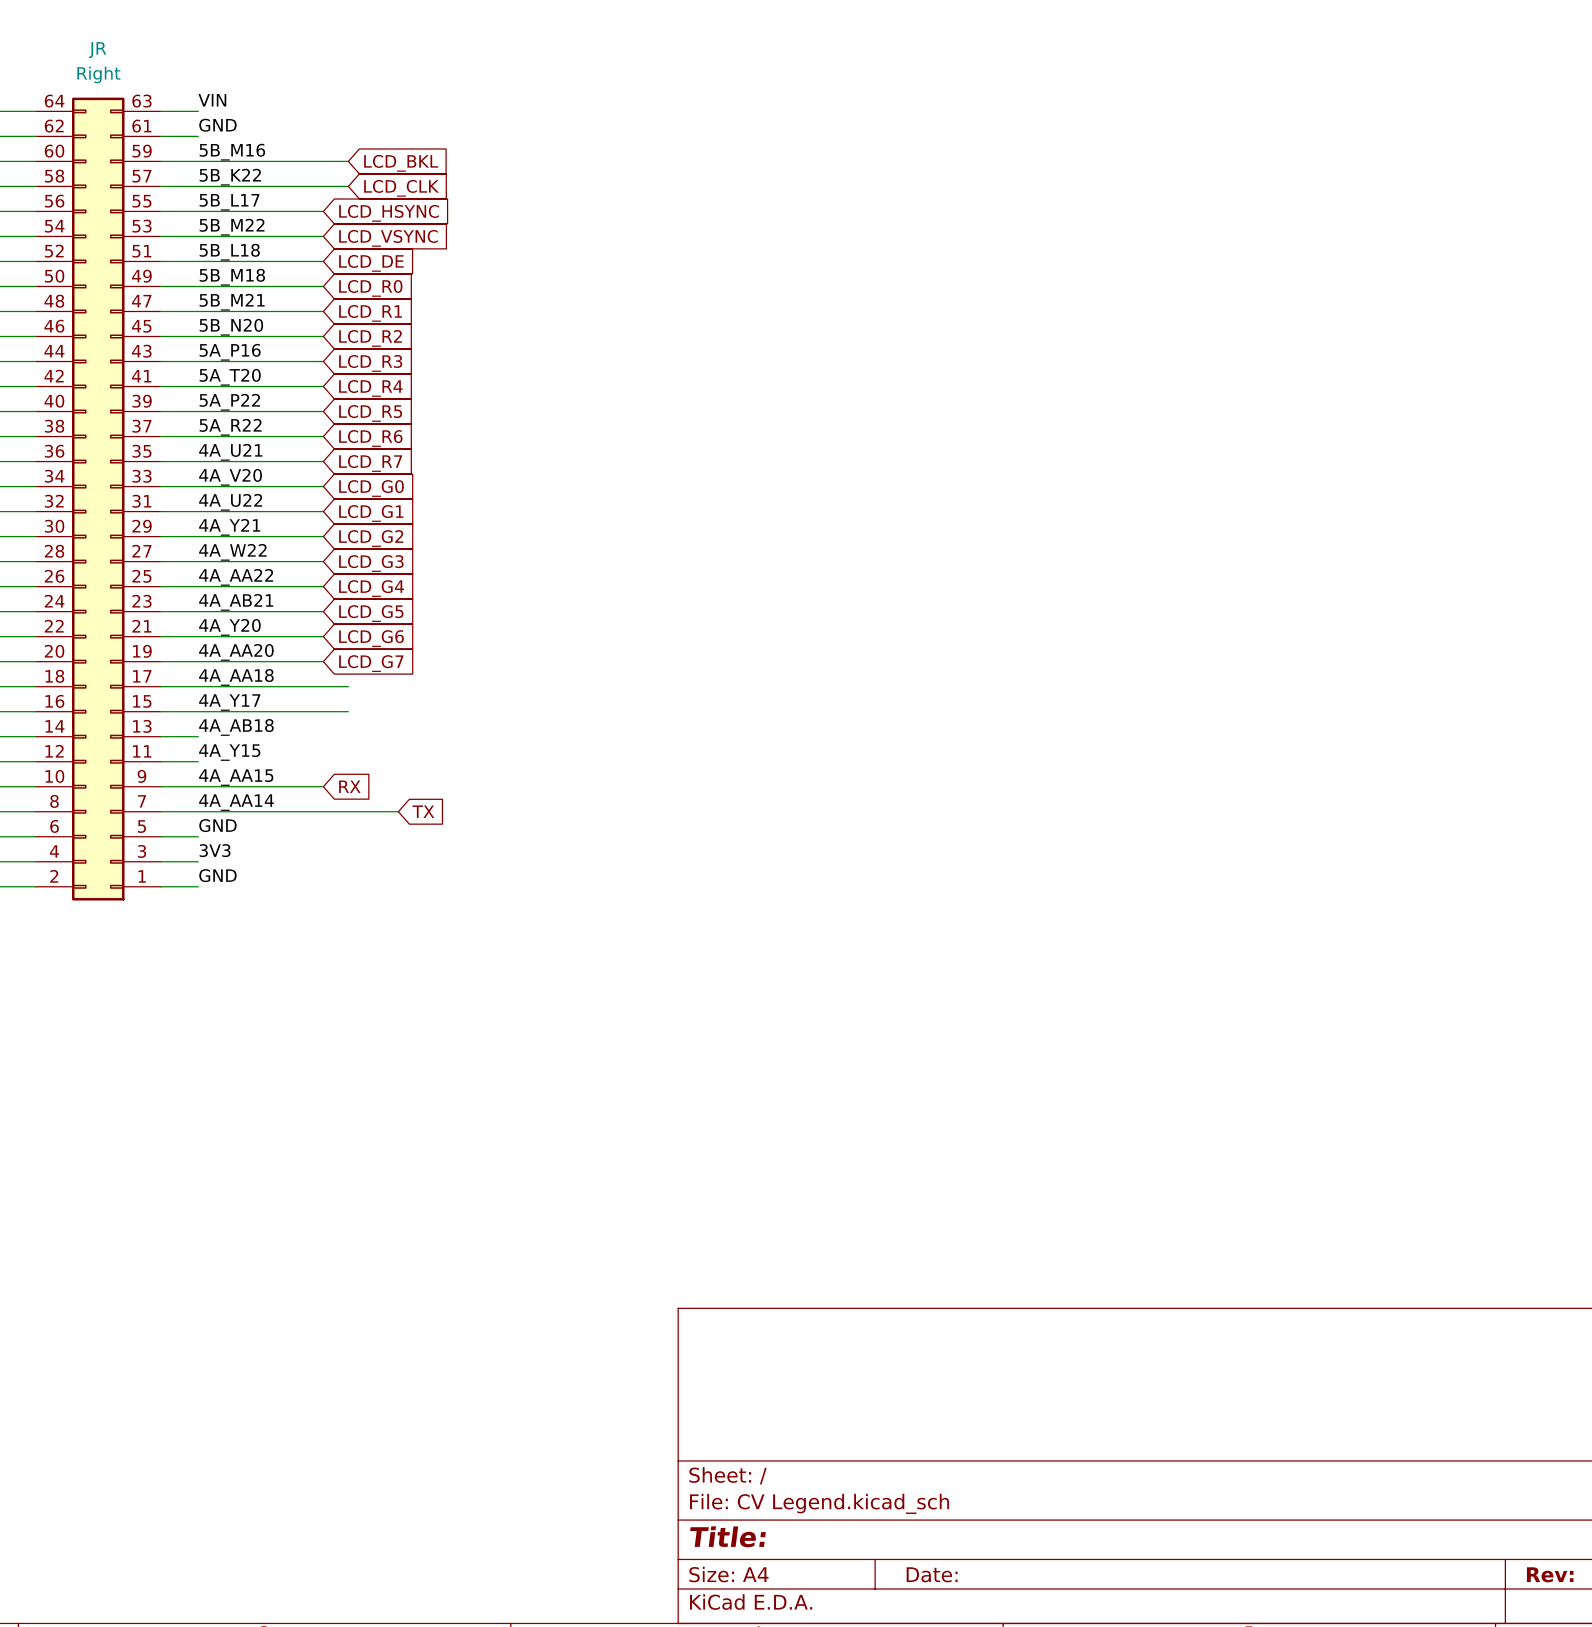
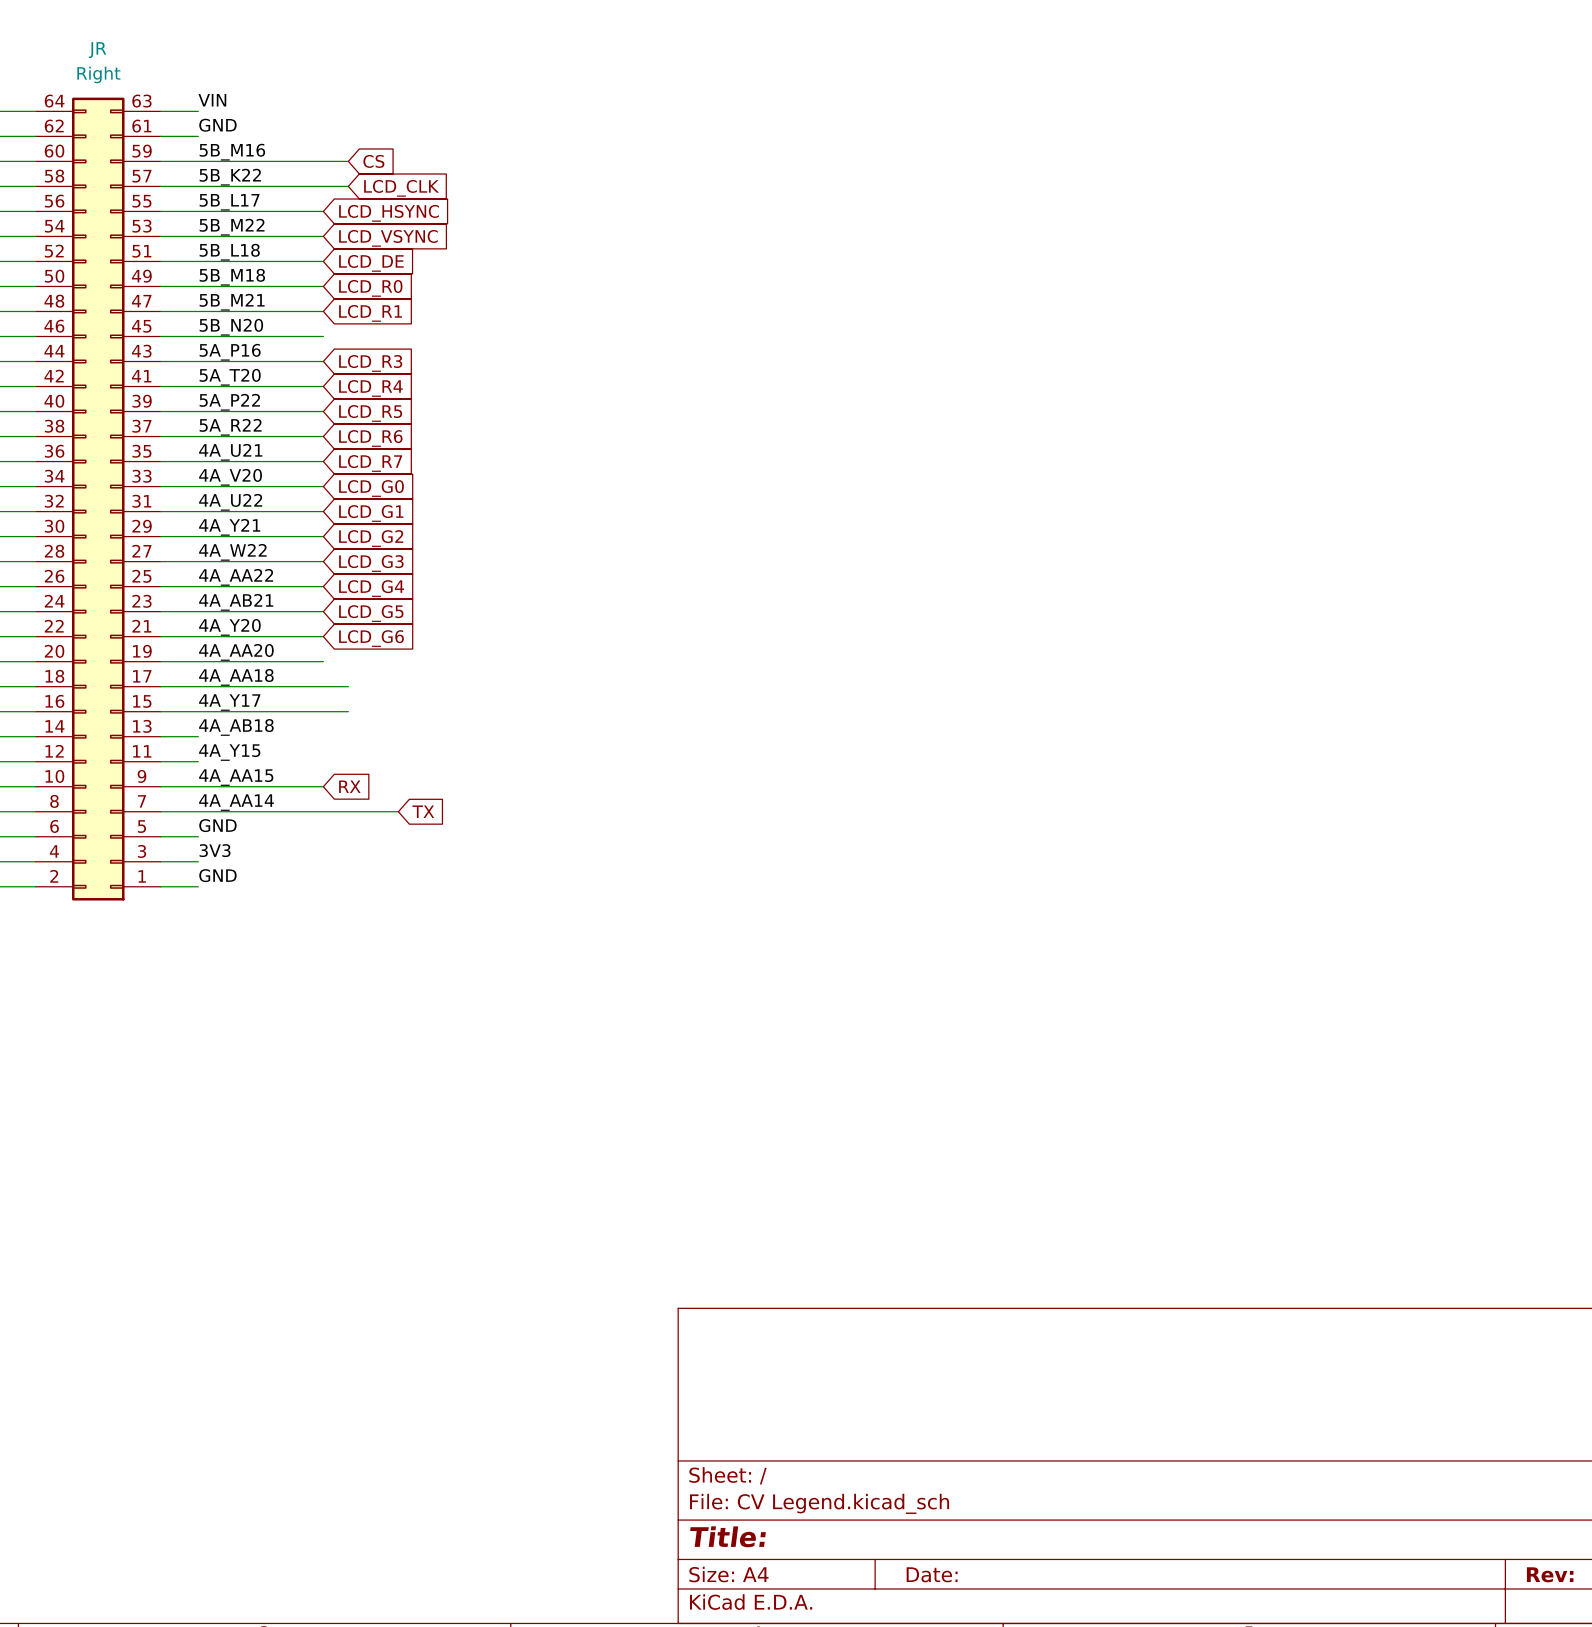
global label: LCD_BKL (401, 163) -> CS (373, 161)
global label: LCD_R2 (370, 338) -> none
global label: LCD_G7 (371, 663) -> none

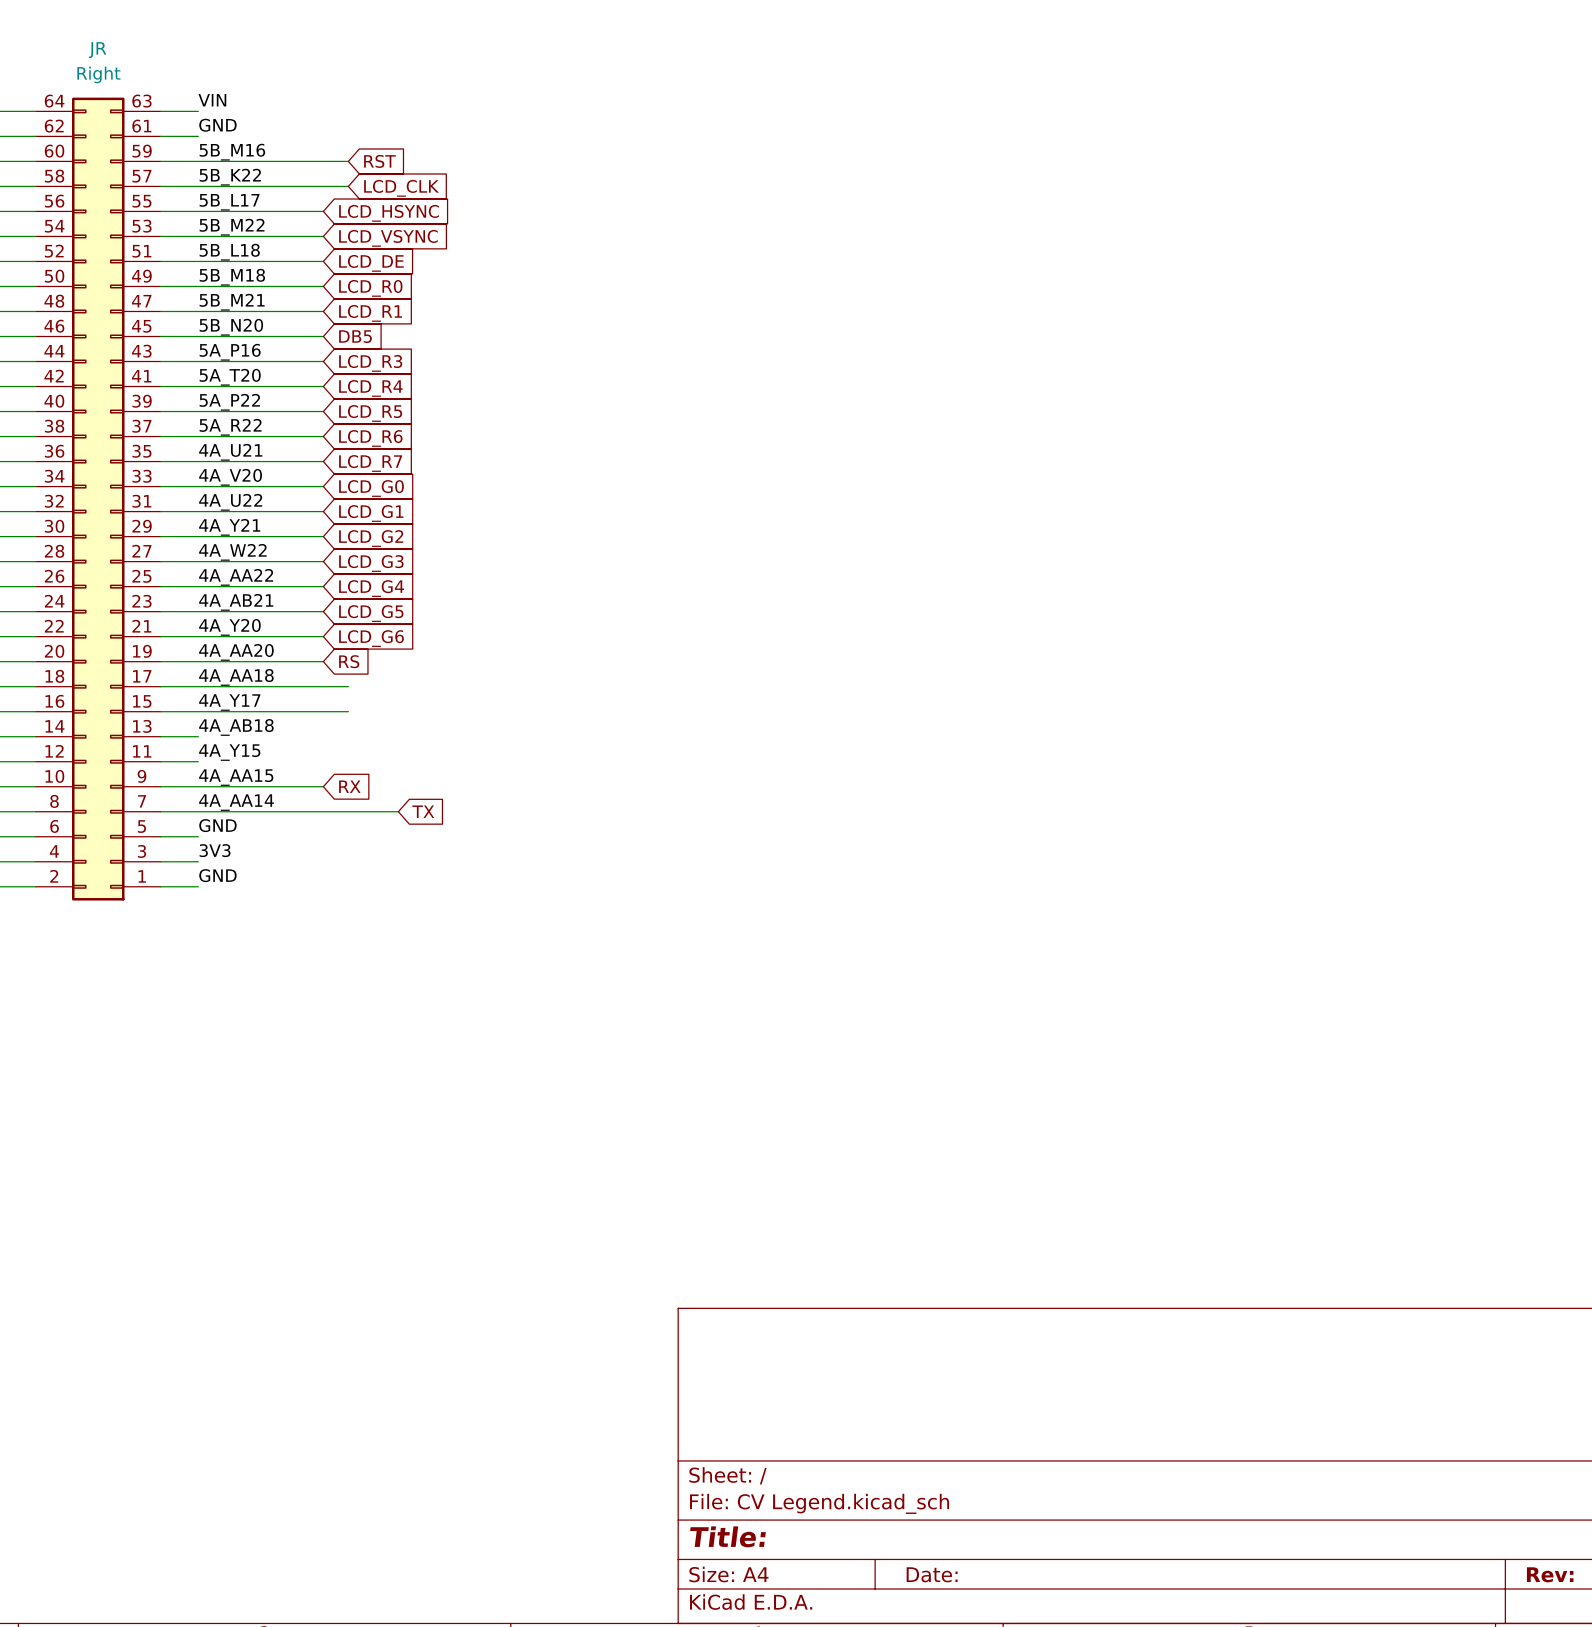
global label: CS (373, 161) -> RST (379, 161)
global label: none -> DB5 (355, 336)
global label: none -> RS (349, 661)

